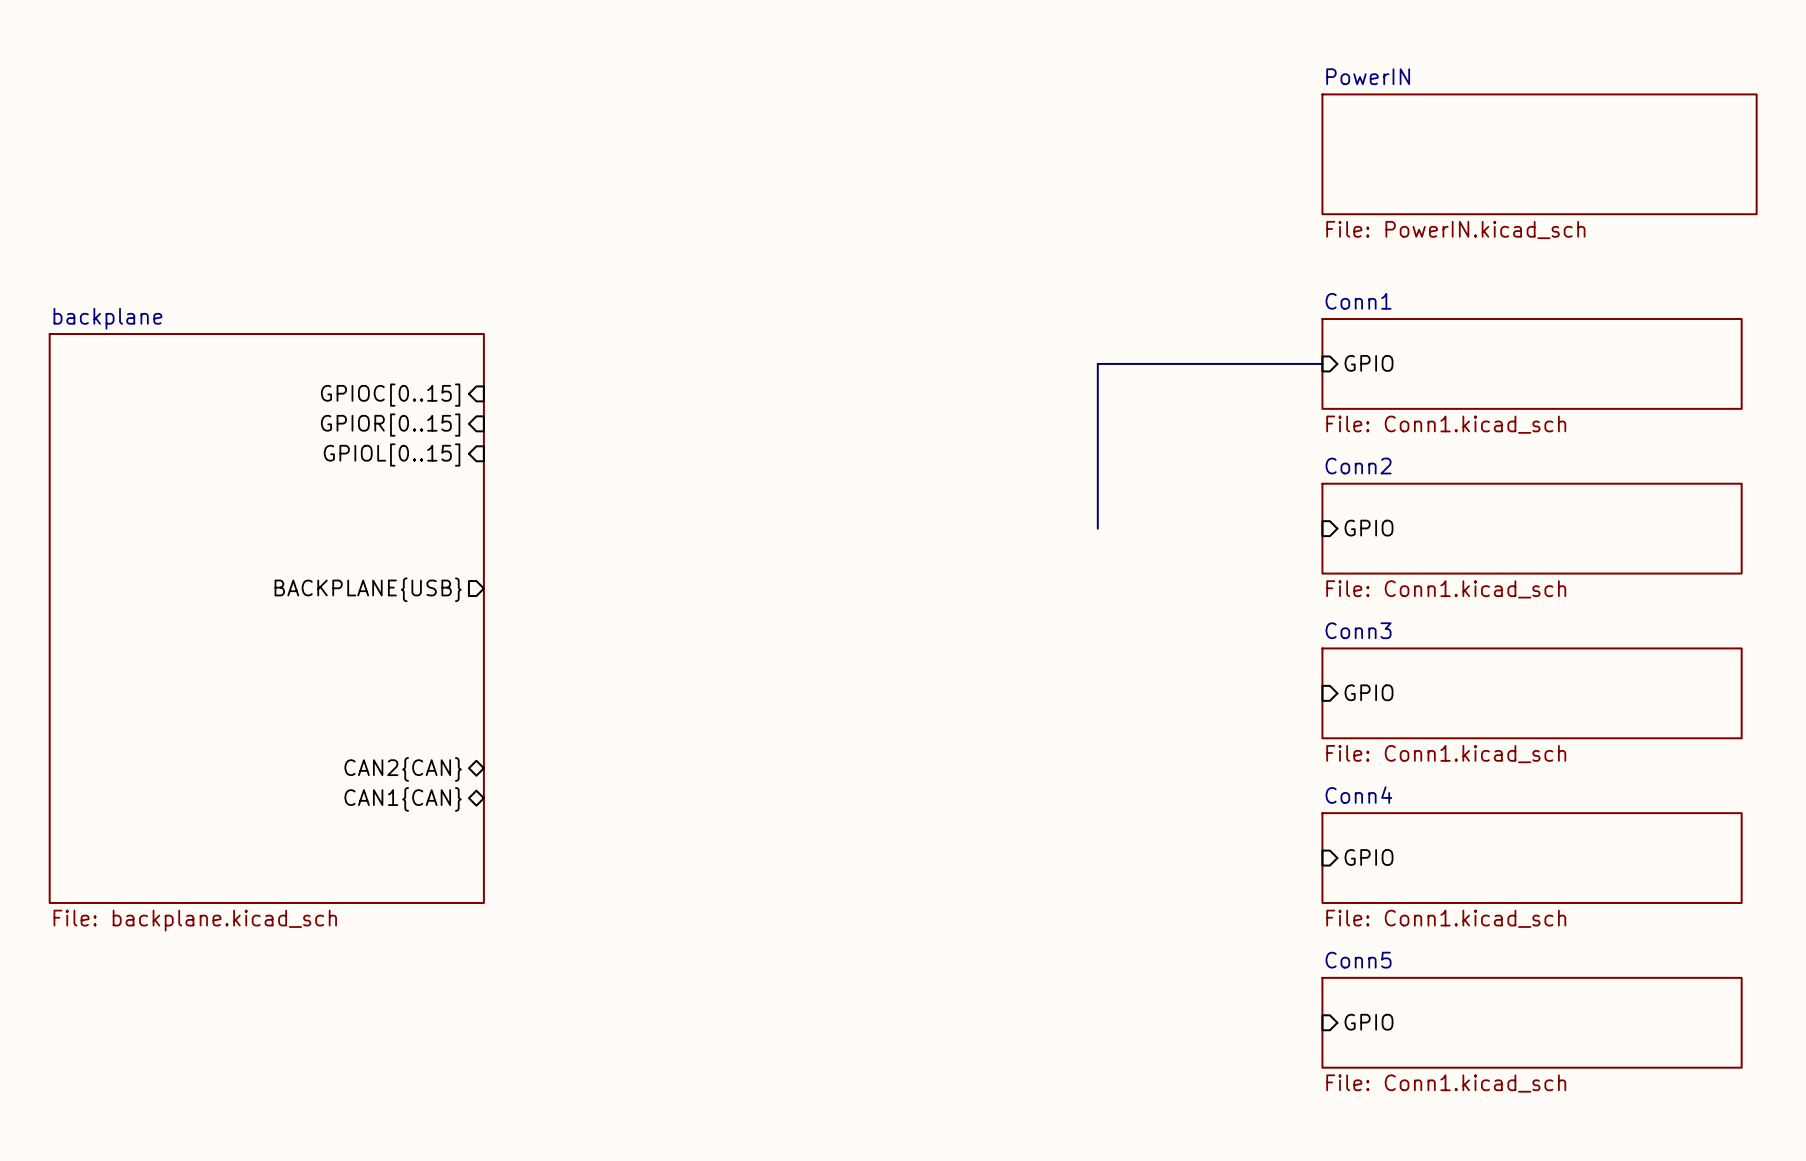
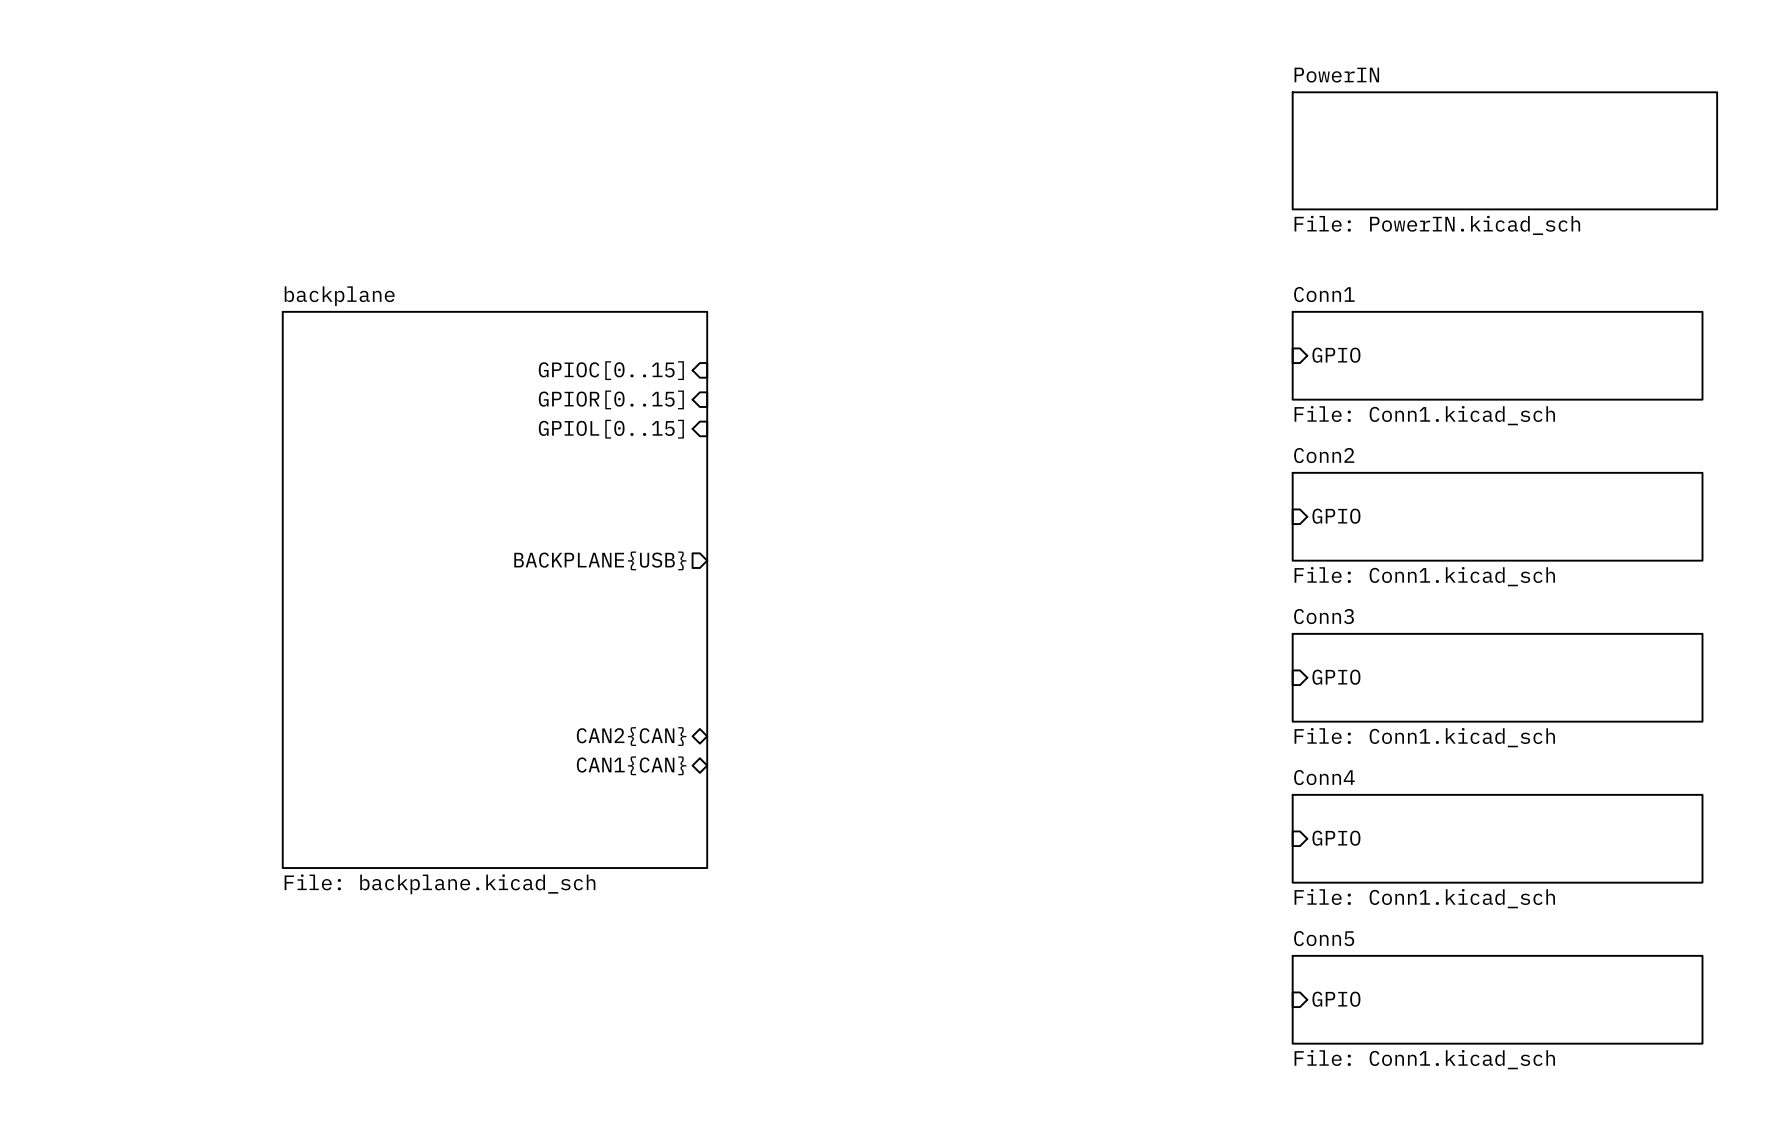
bus: (1322, 363) (1097, 363) (1097, 528) -> none
sheet pin position: GPIOC[0..15] (390, 395) -> GPIOC[0..15] (611, 370)
sheet pin position: GPIOR[0..15] (390, 425) -> GPIOR[0..15] (611, 399)
sheet pin position: GPIOL[0..15] (392, 455) -> GPIOL[0..15] (611, 429)
sheet pin position: BACKPLANE{USB} (368, 589) -> BACKPLANE{USB} (600, 560)
sheet backplane position: (266, 618) -> (494, 589)
sheet pin position: CAN2{CAN} (403, 769) -> CAN2{CAN} (631, 736)
sheet pin position: CAN1{CAN} (403, 799) -> CAN1{CAN} (631, 765)

